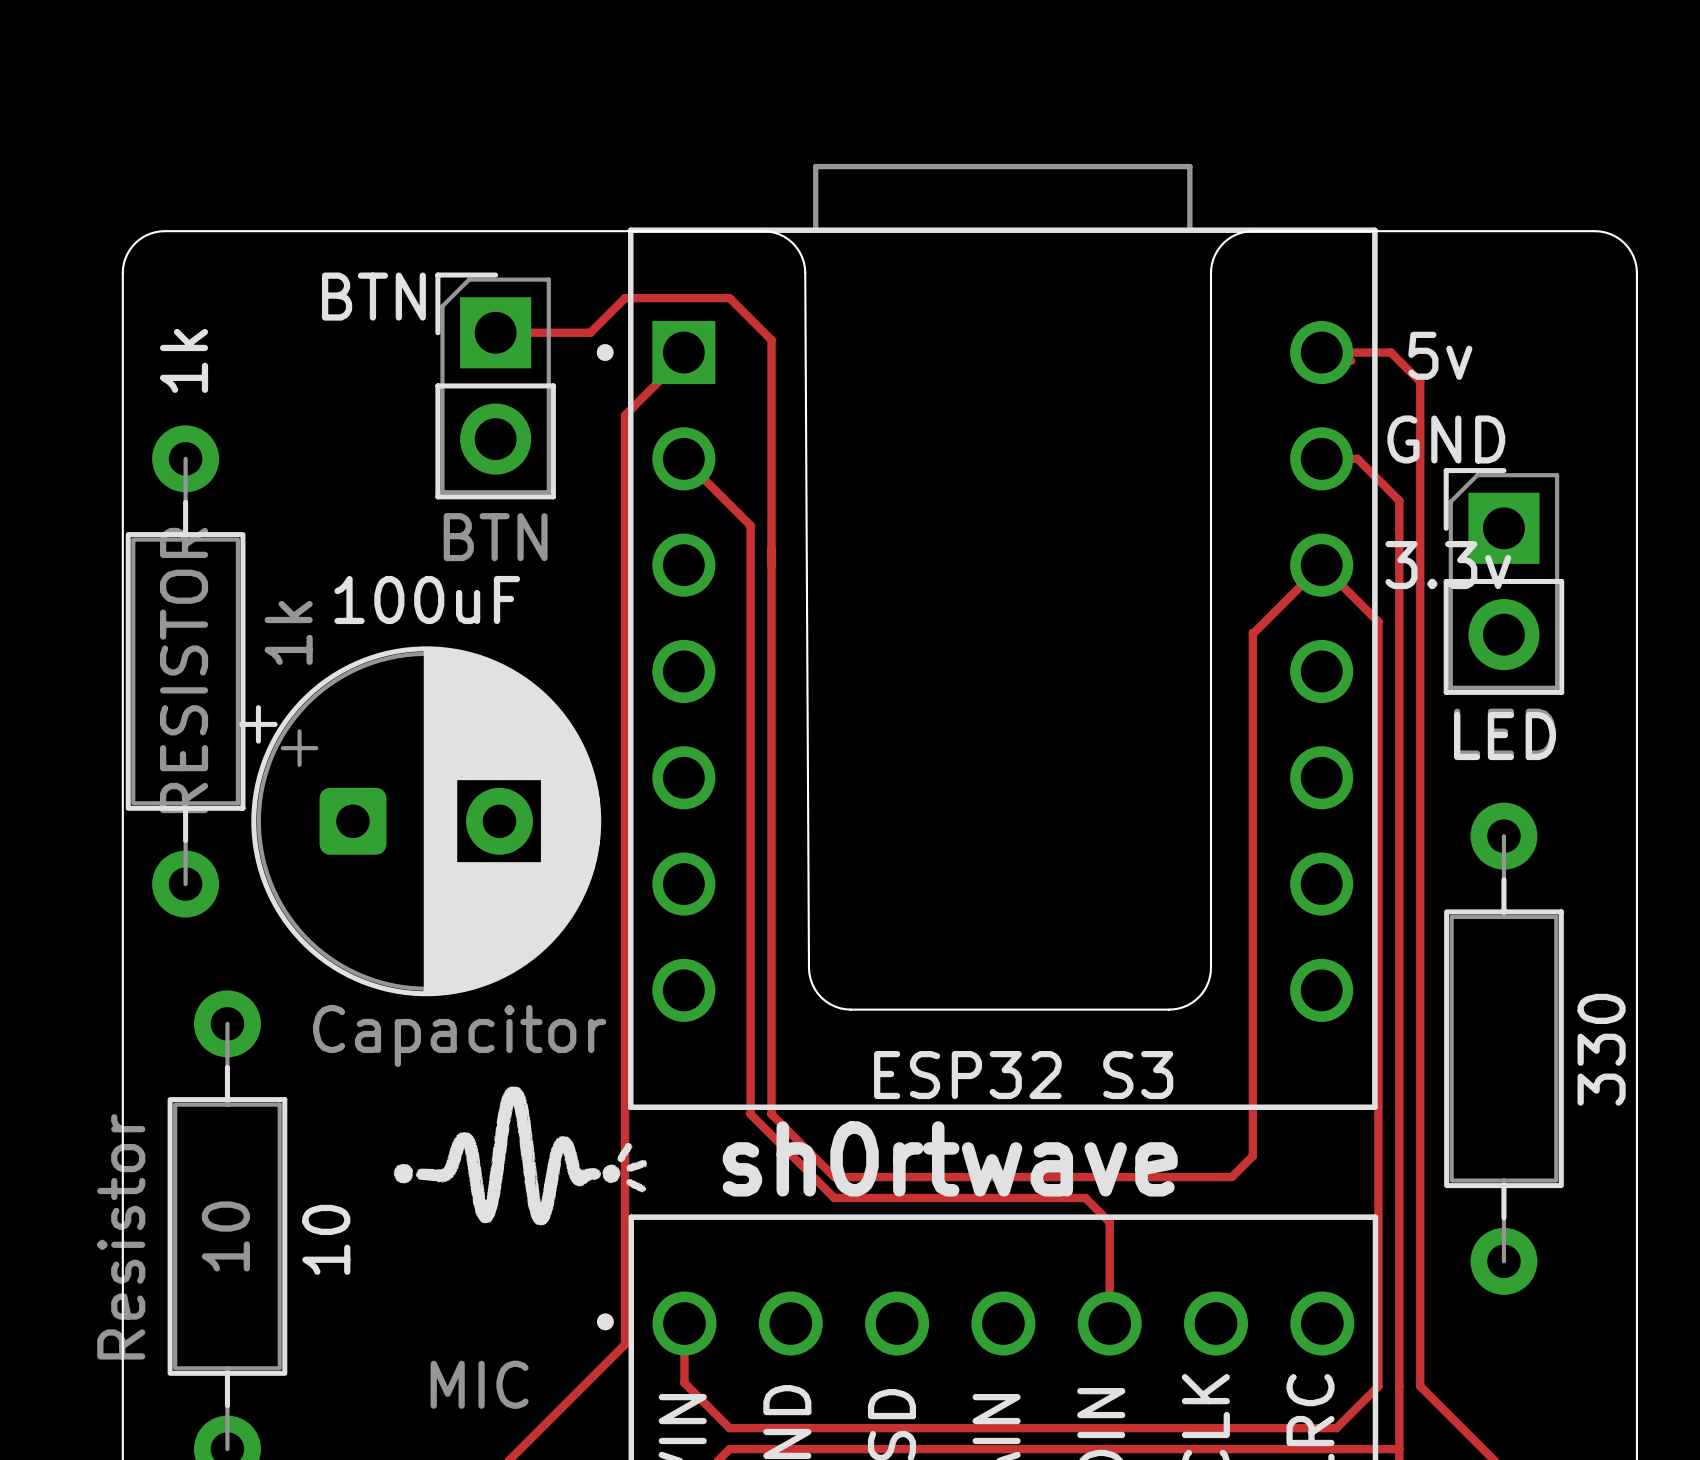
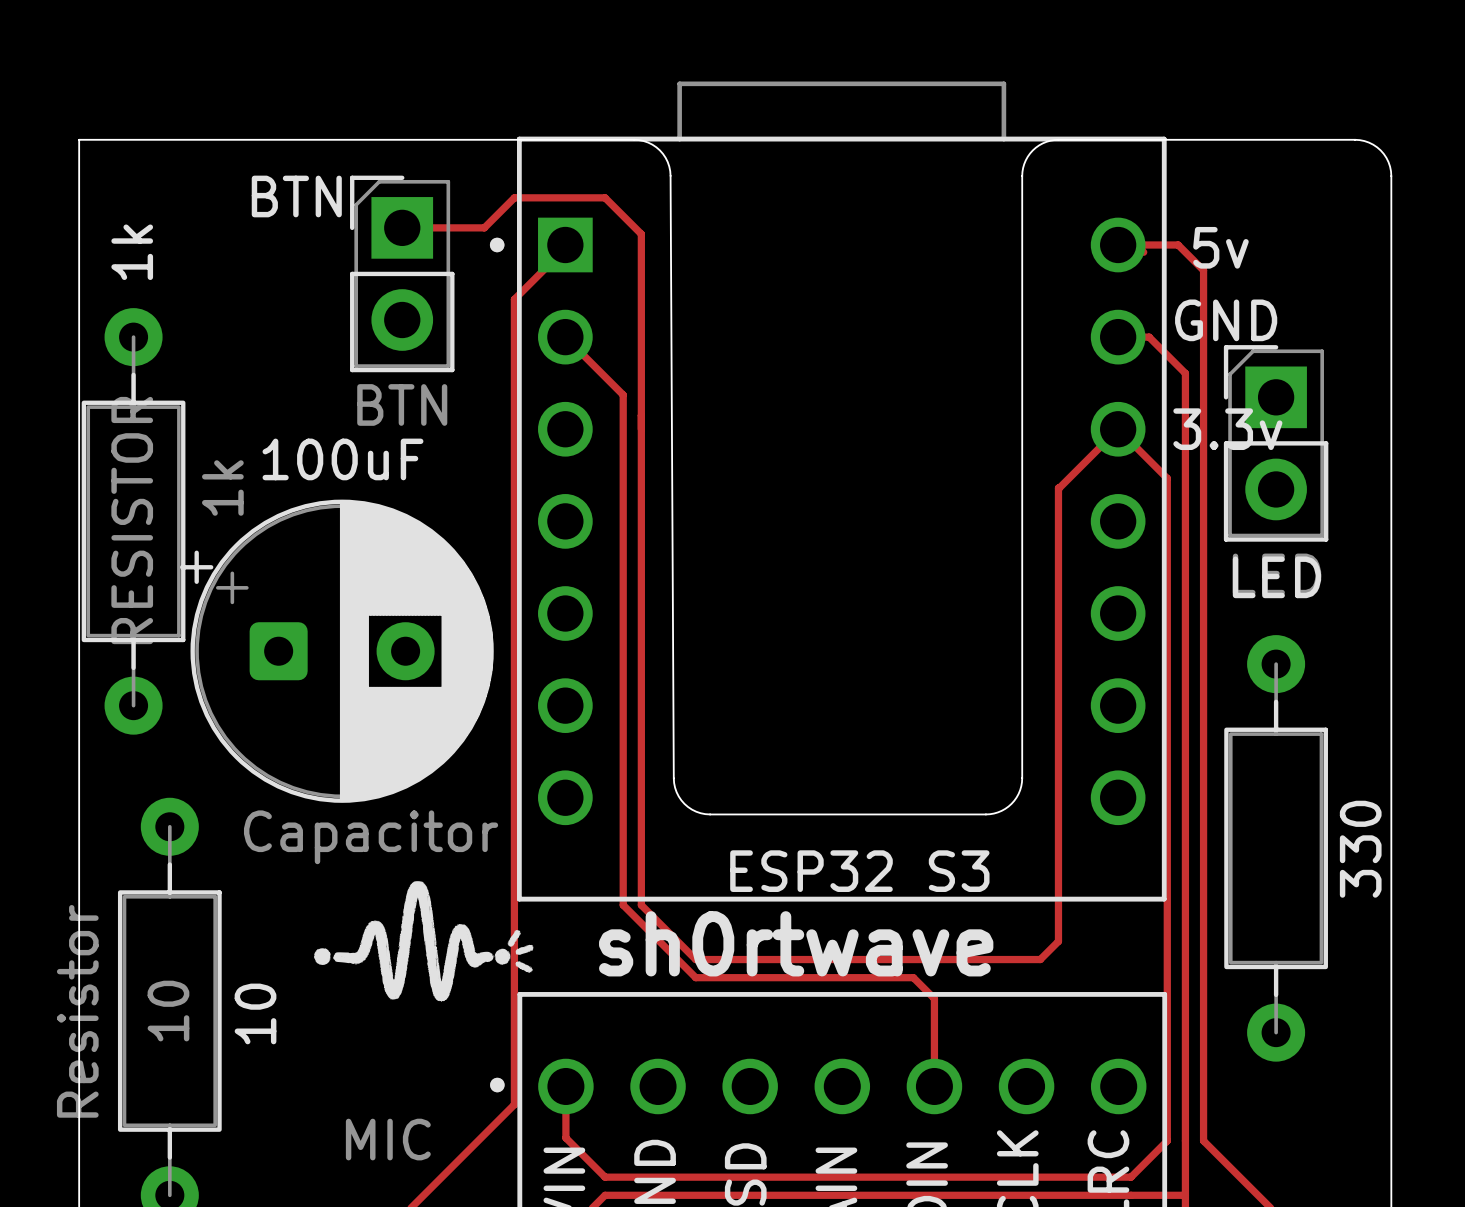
board edge: (164, 231) (146, 235) (135, 243) (126, 254) (122, 273) -> (115, 139) (79, 139) (79, 176)

